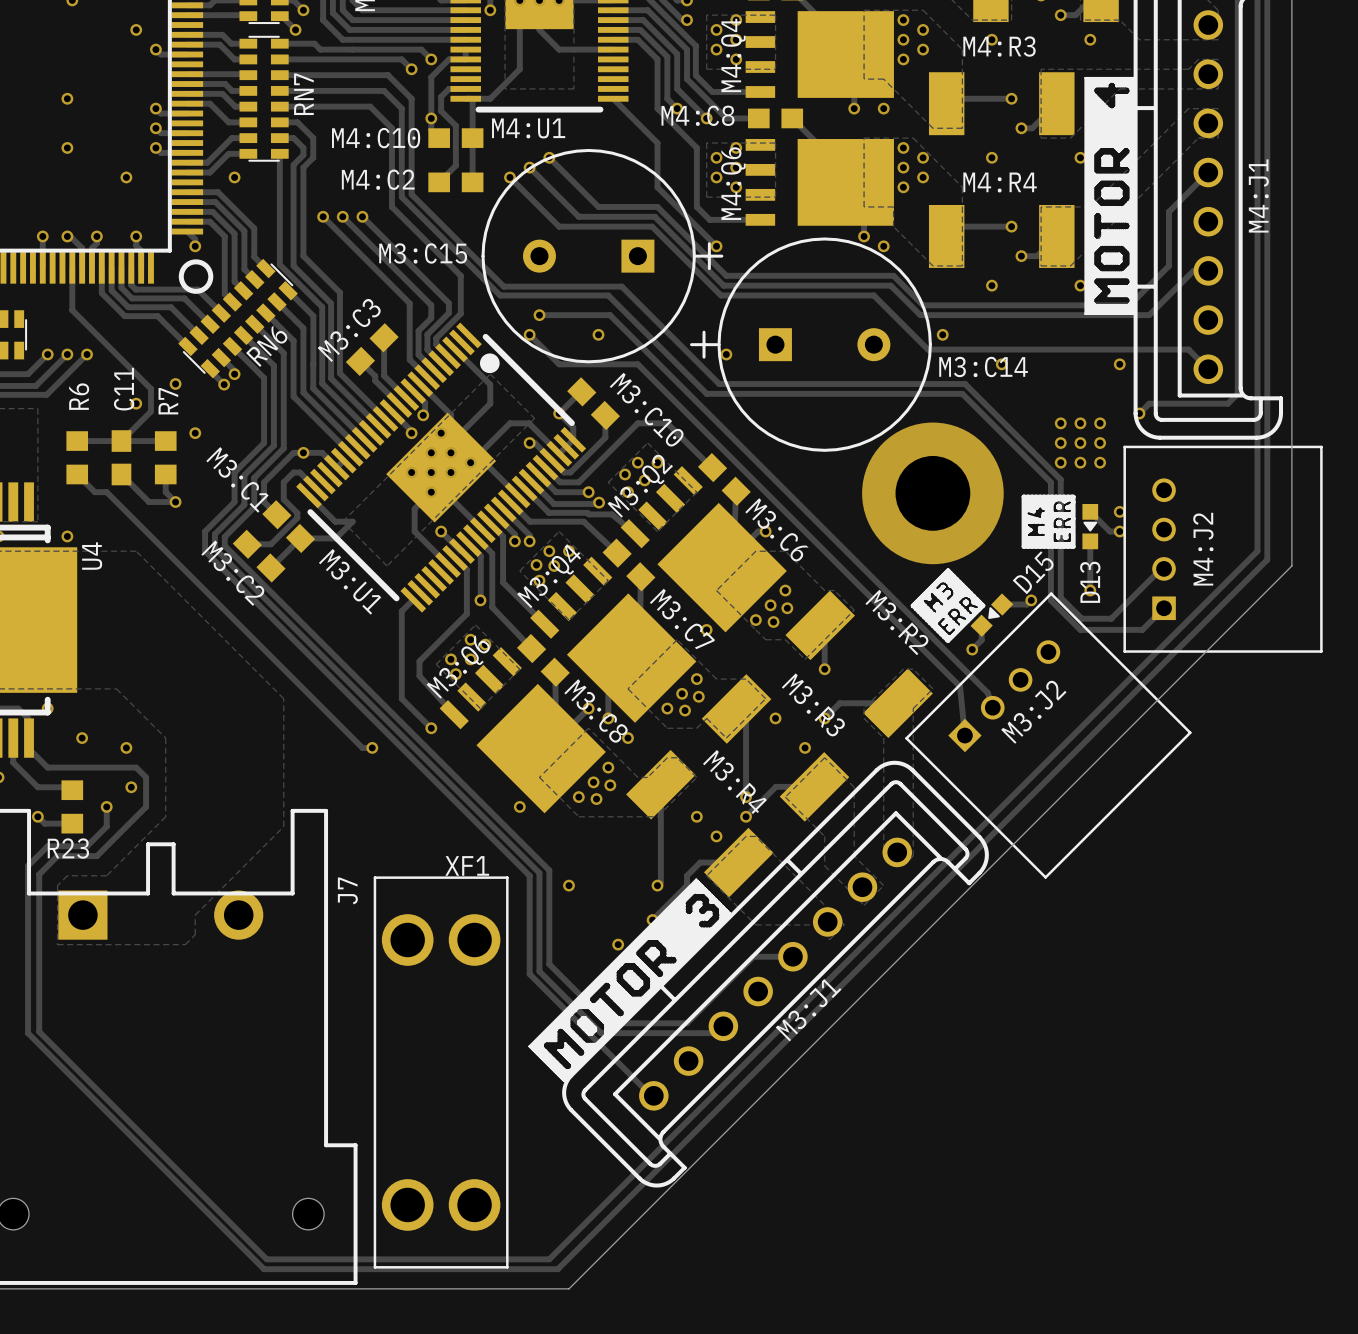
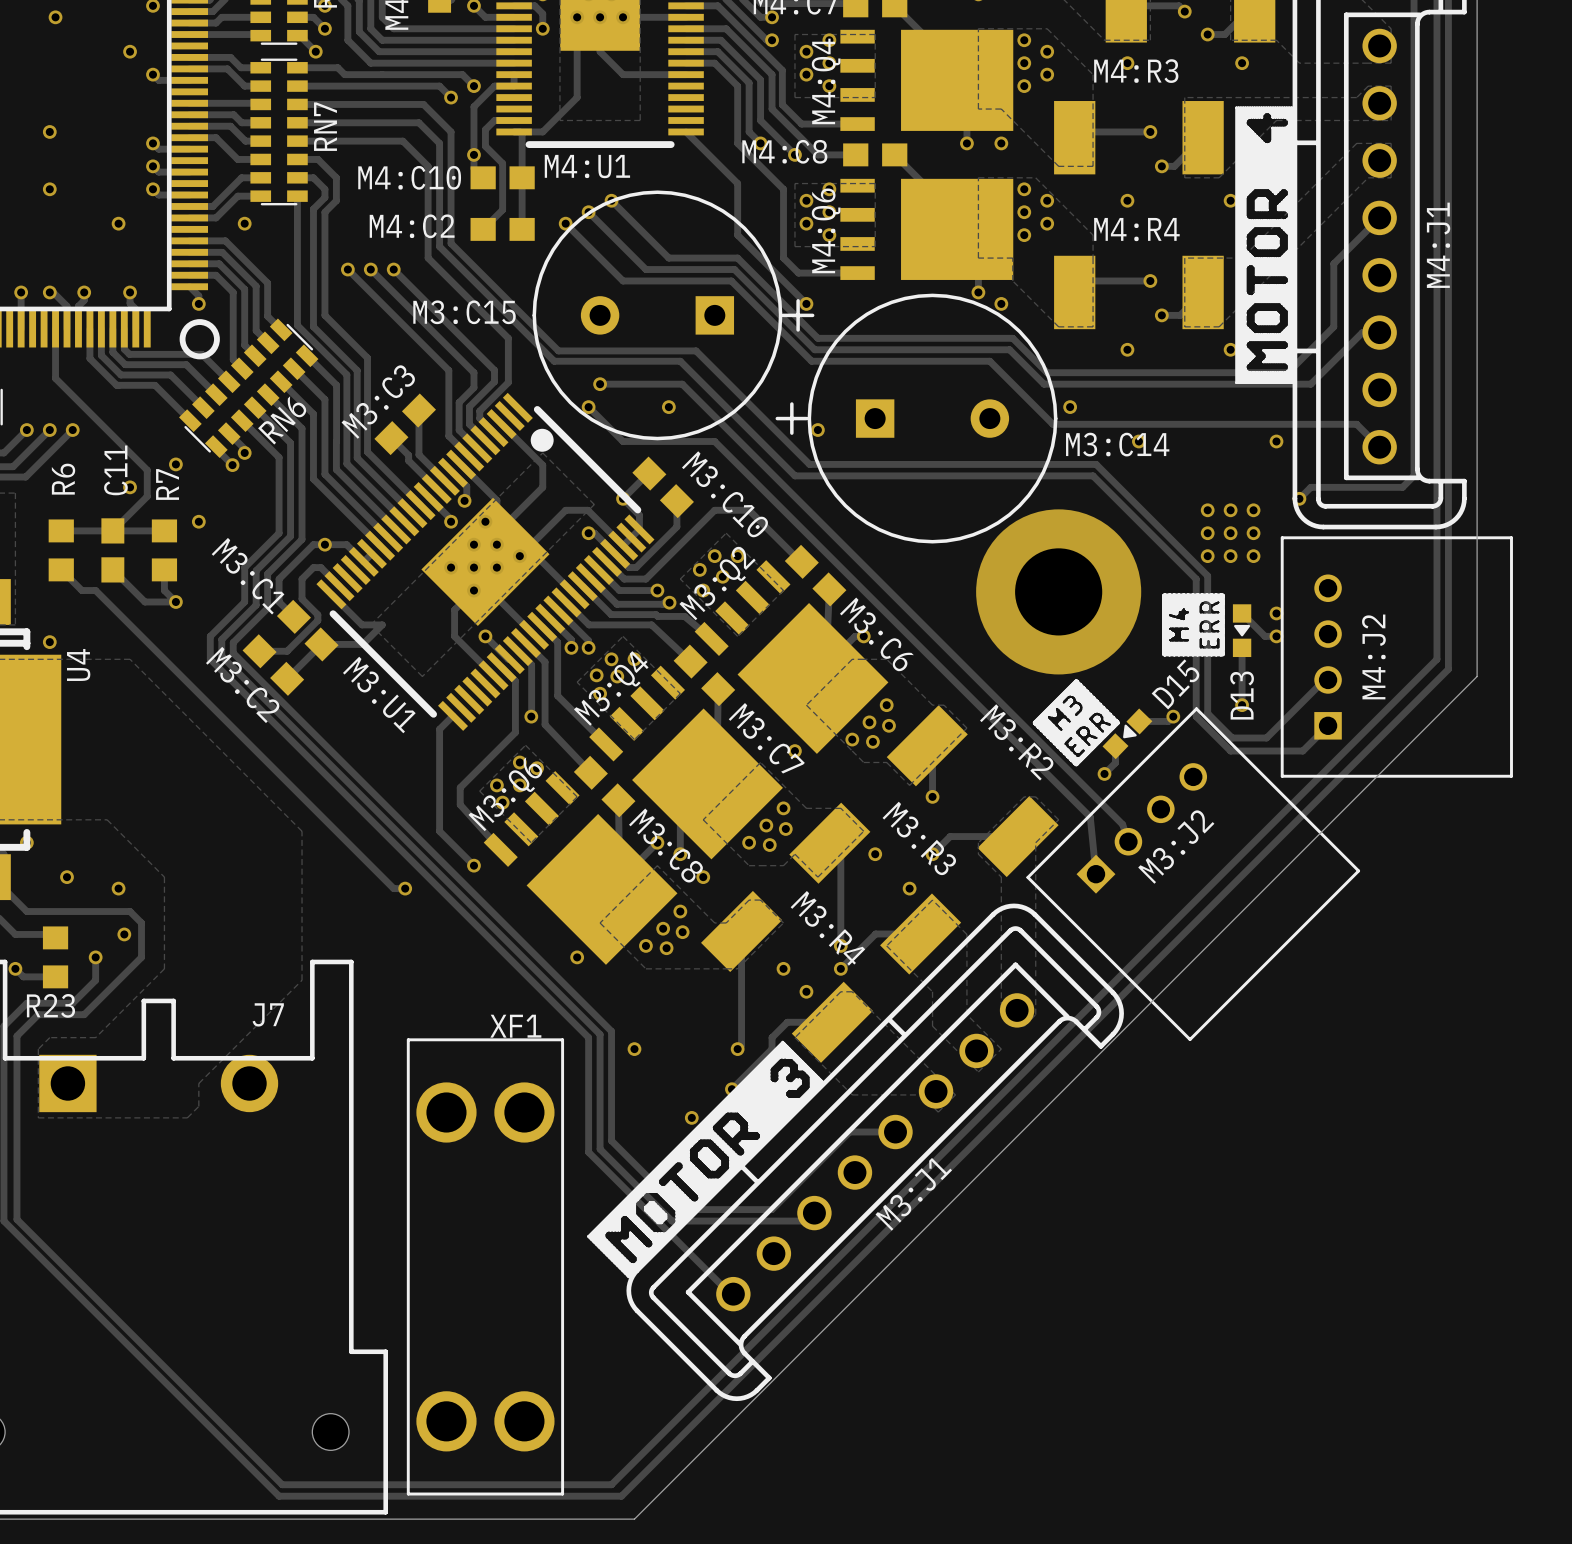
J7 name rotation: 0° (347, 890) -> 90° clockwise (268, 1014)
J7 name position: J7 (347, 890) -> J7 (268, 1014)

